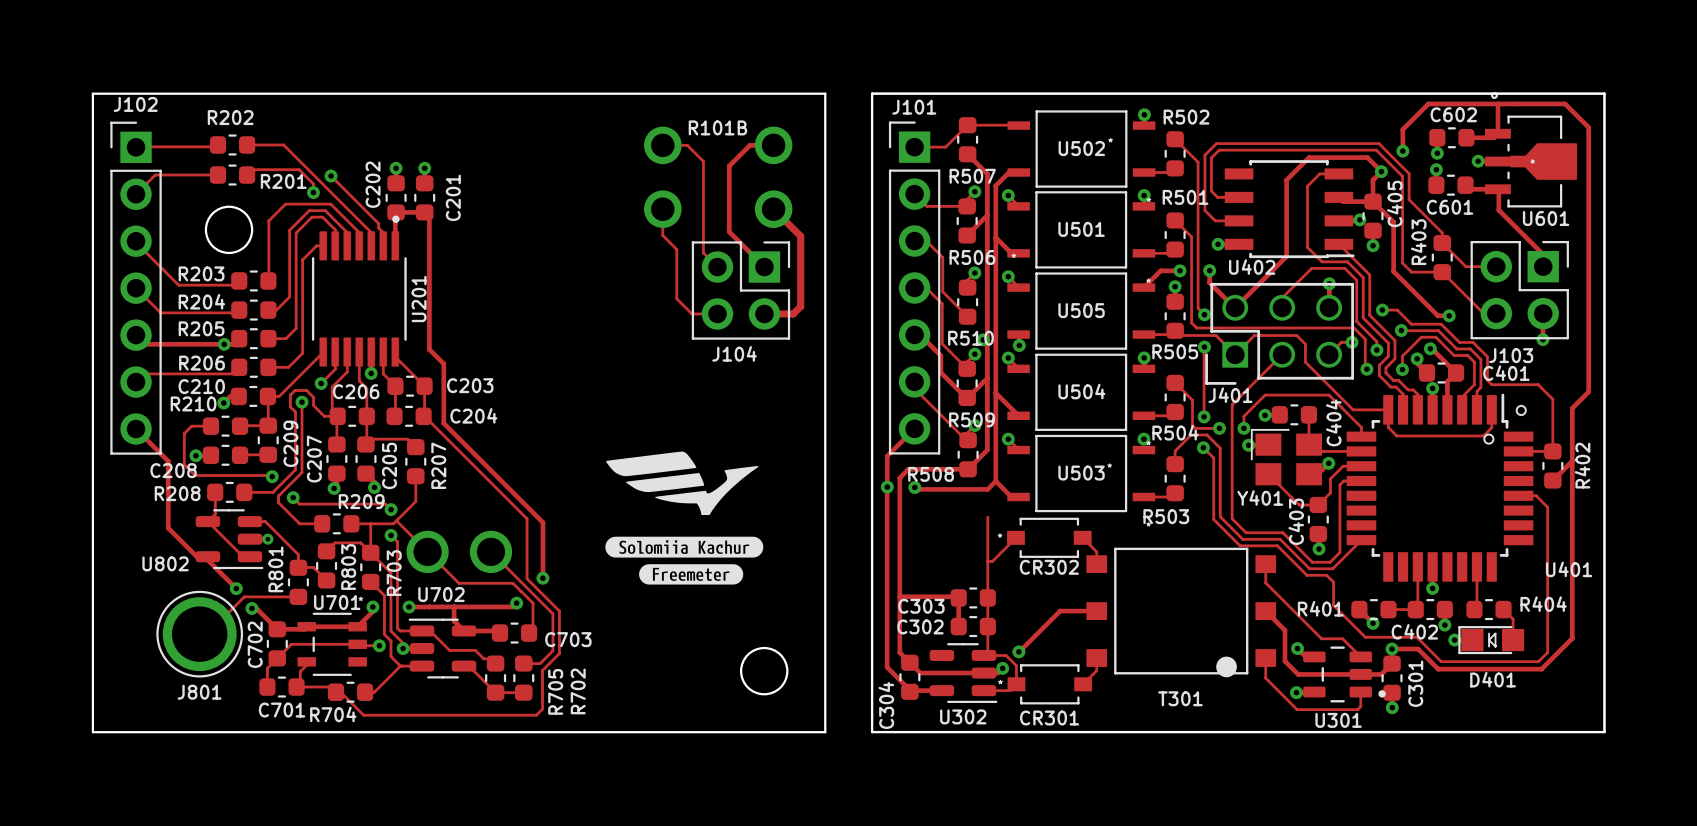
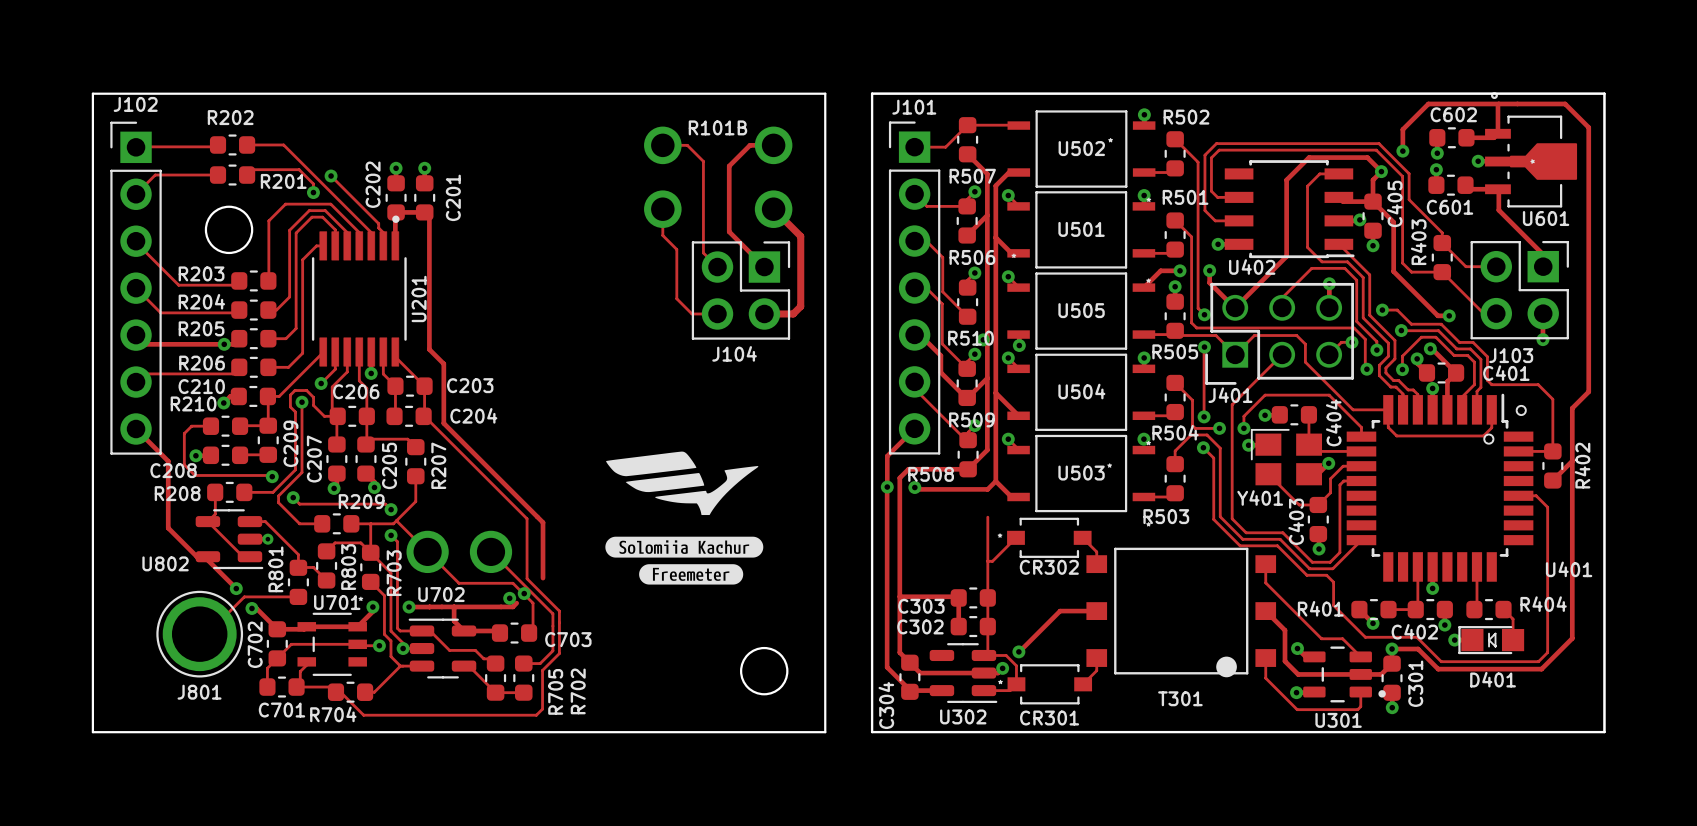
via: (542, 578) -> none
via: none -> (524, 593)
via: none -> (509, 598)
via: (516, 603) -> none

